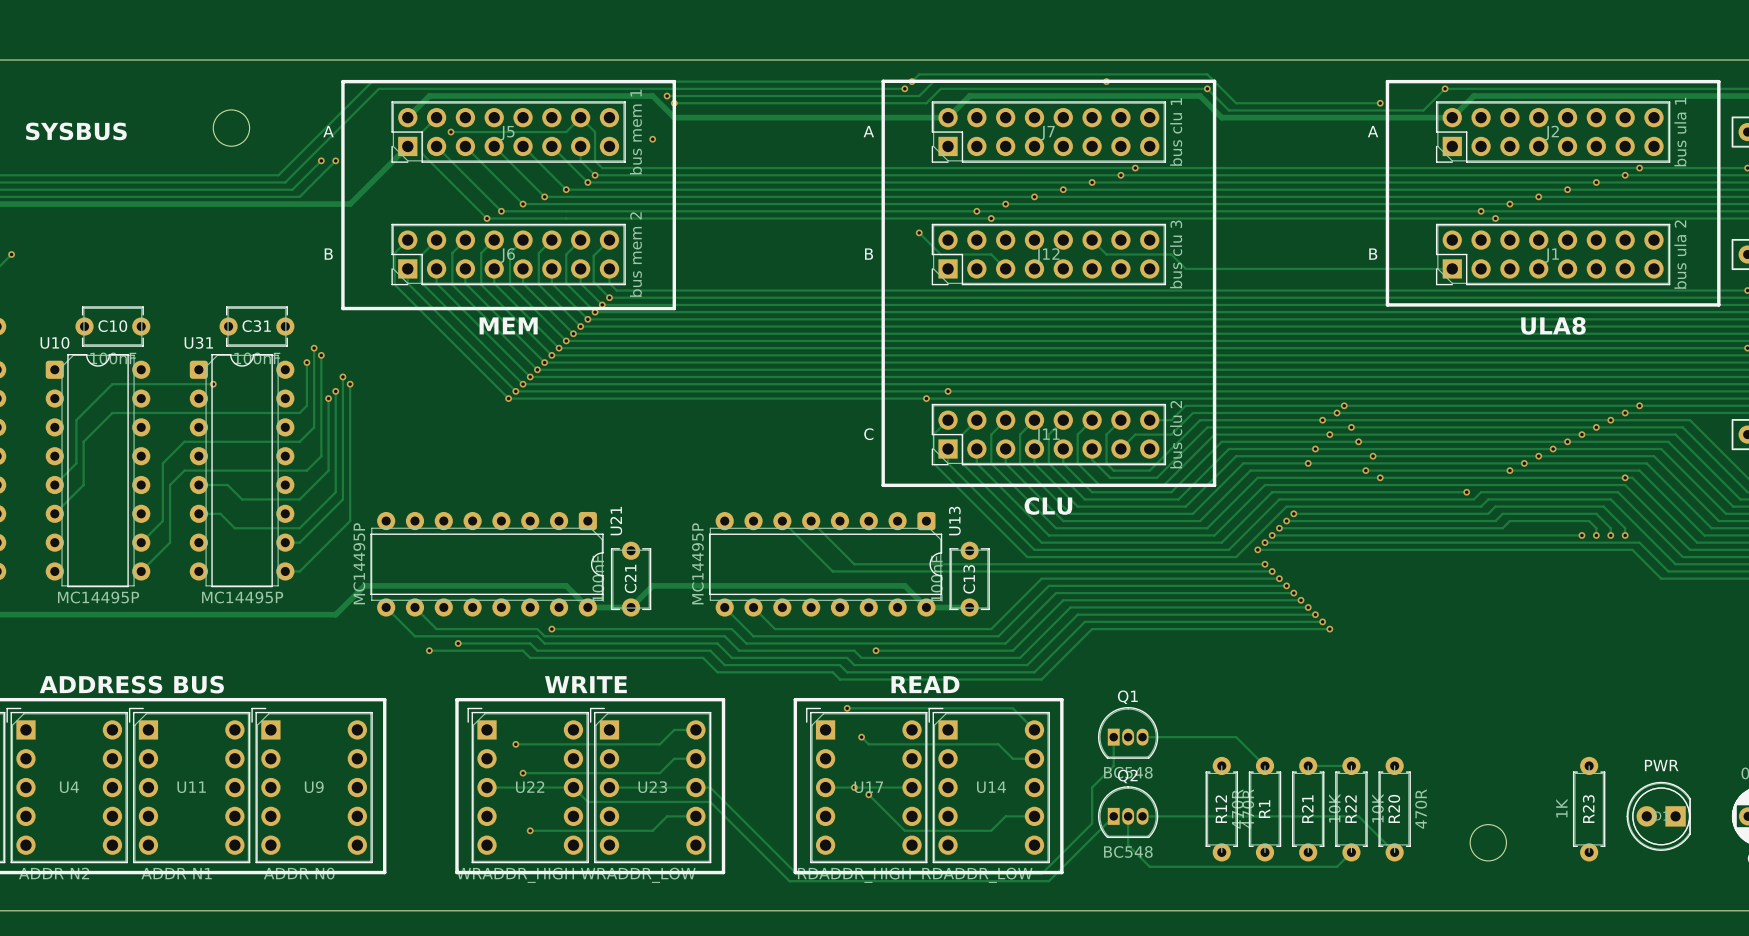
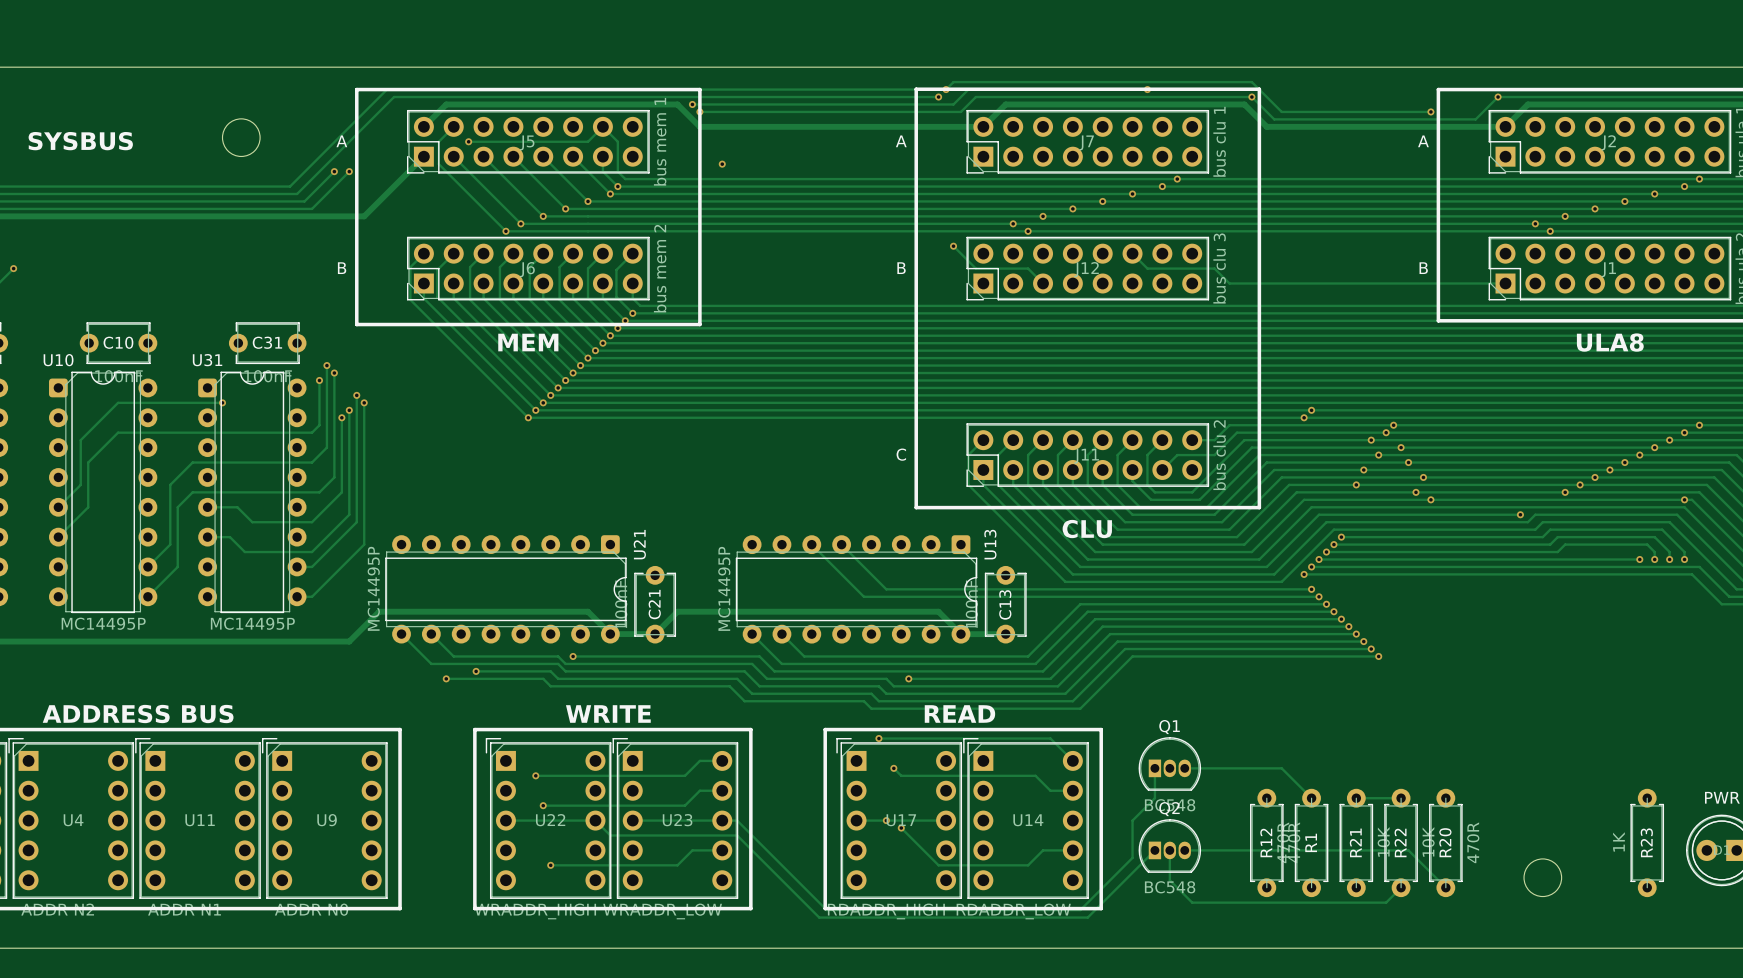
via position: (652, 139) -> (722, 164)
via: (948, 391) -> none
via: none -> (1311, 410)
via: (926, 398) -> none
via: none -> (1304, 417)

